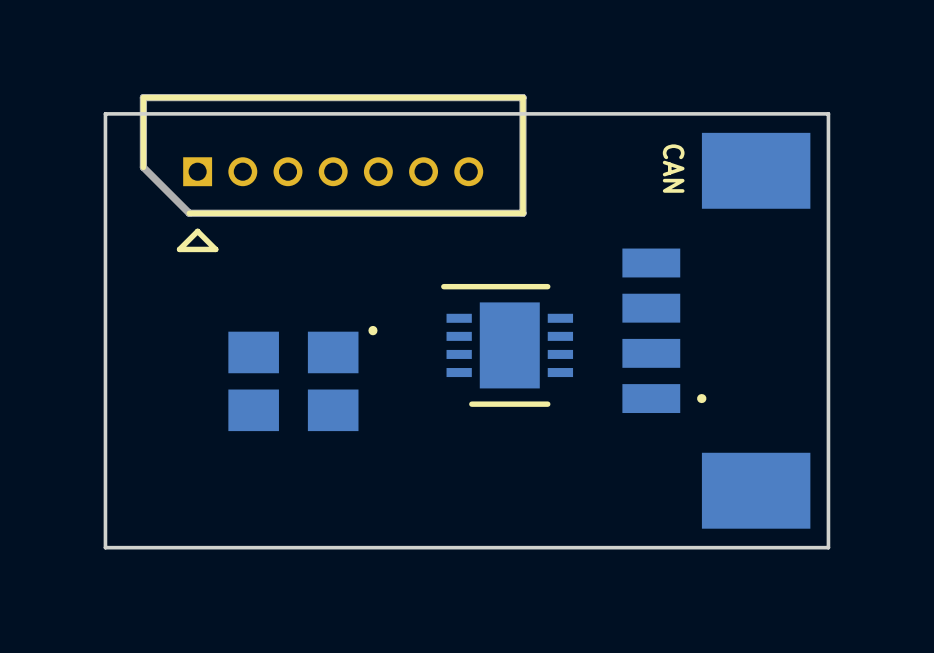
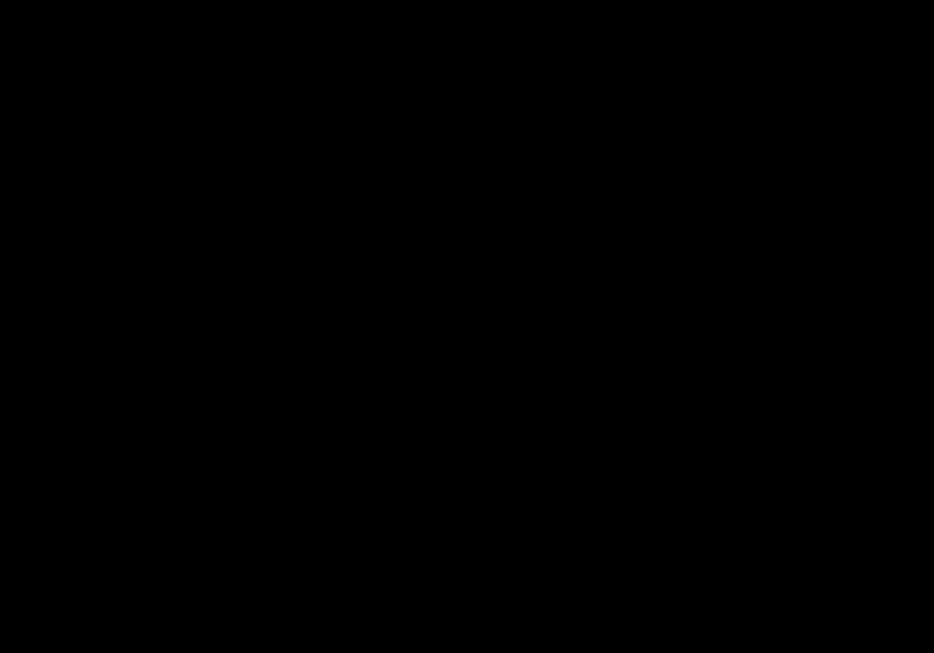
board edge: (828, 113) (828, 547) (105, 547) (105, 113) (828, 113) -> none
part: (333, 173) -> none
part: CAN (716, 330) -> none
part: (507, 345) -> none
part: (302, 378) -> none

